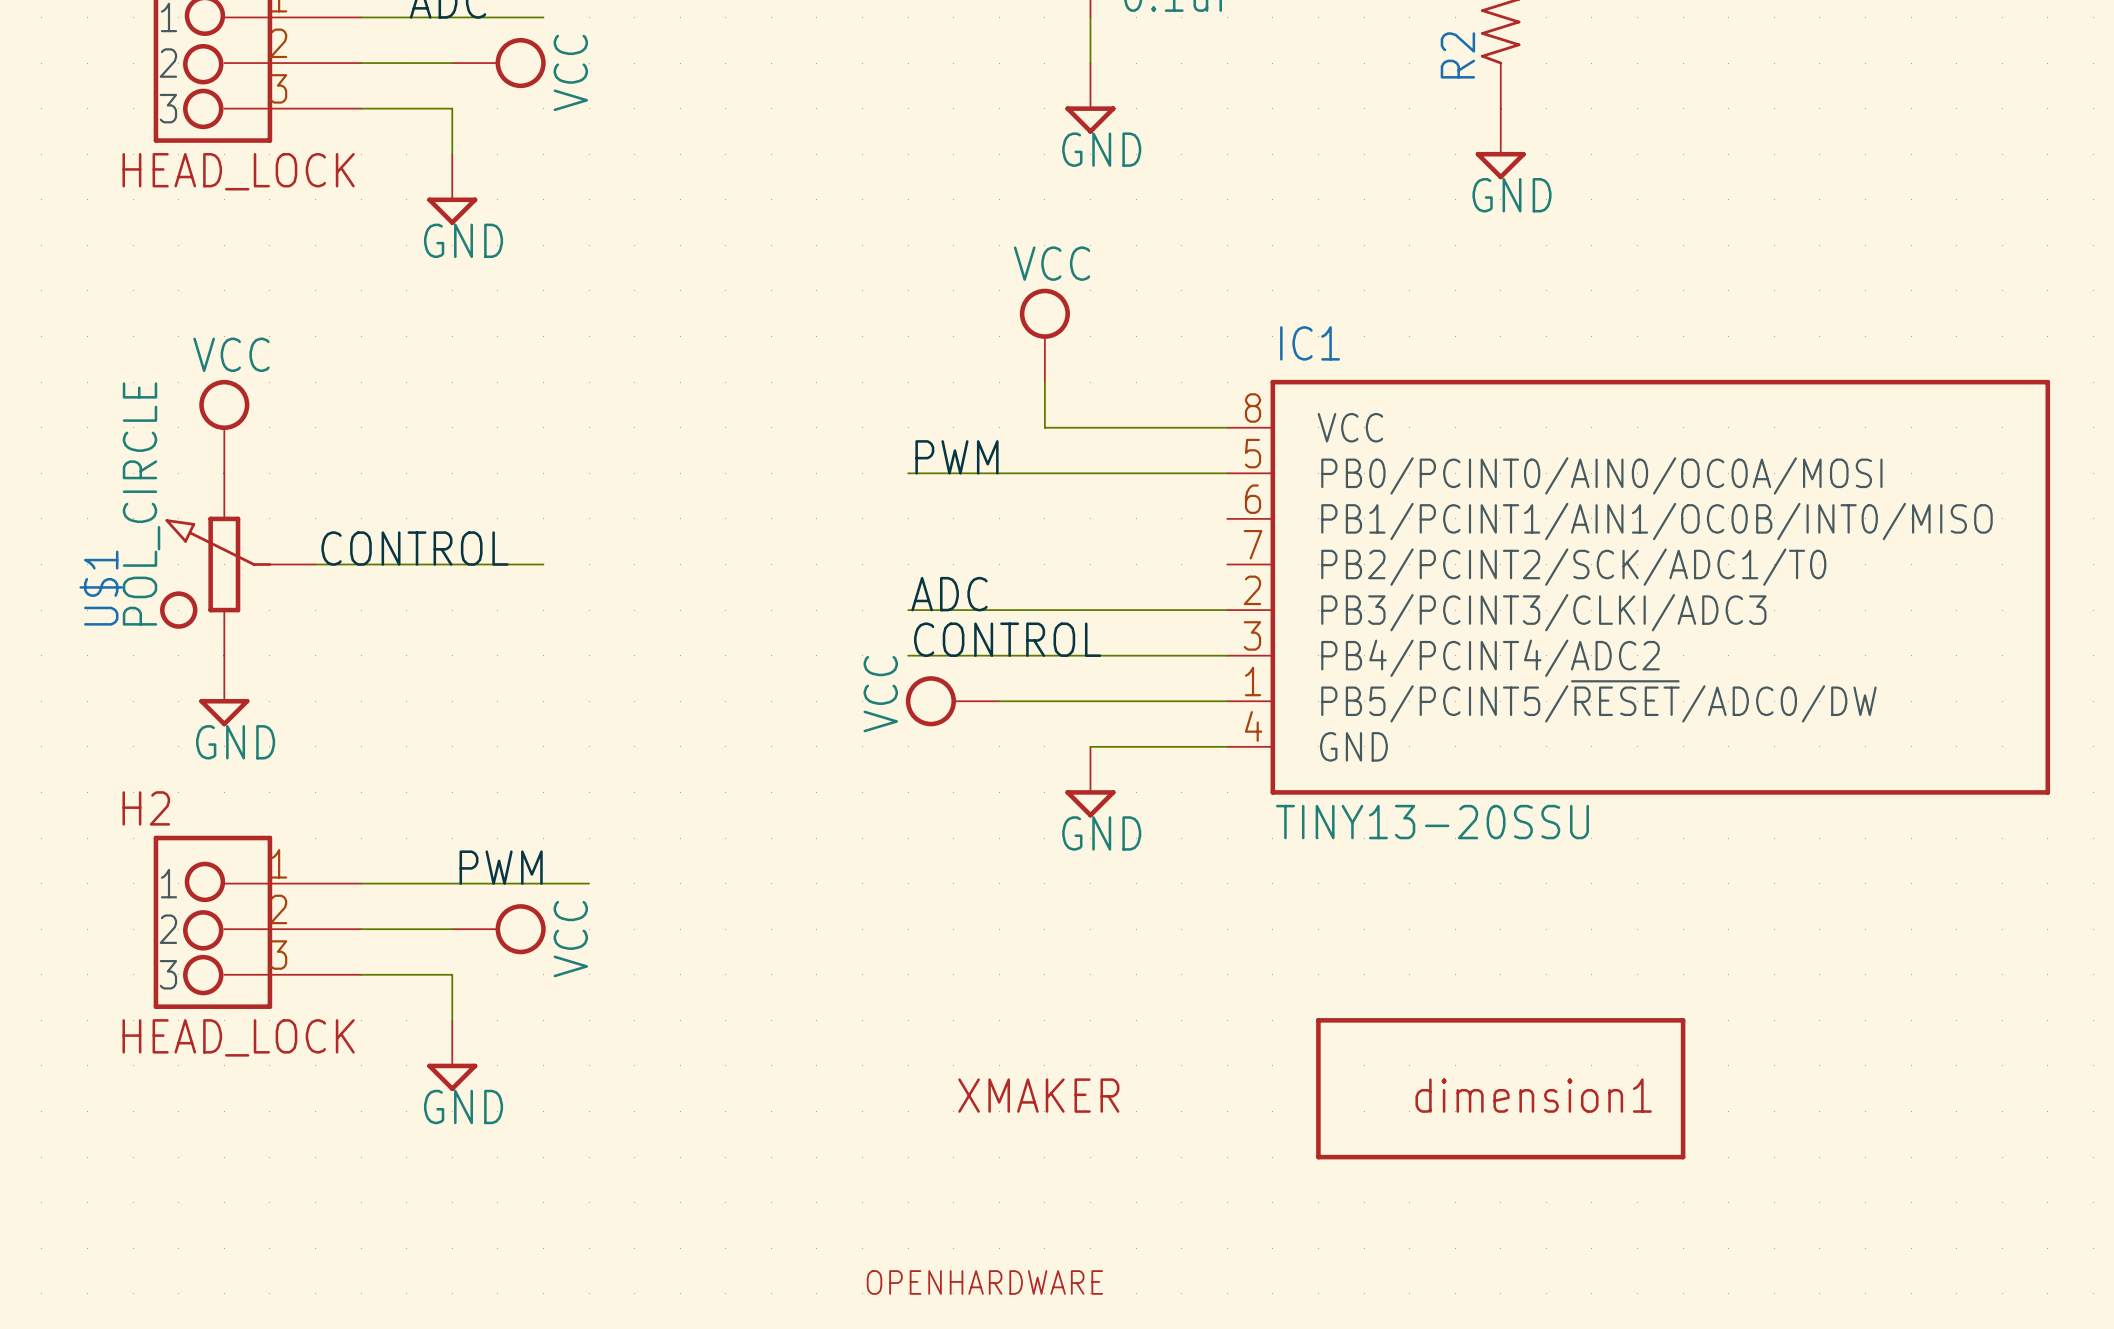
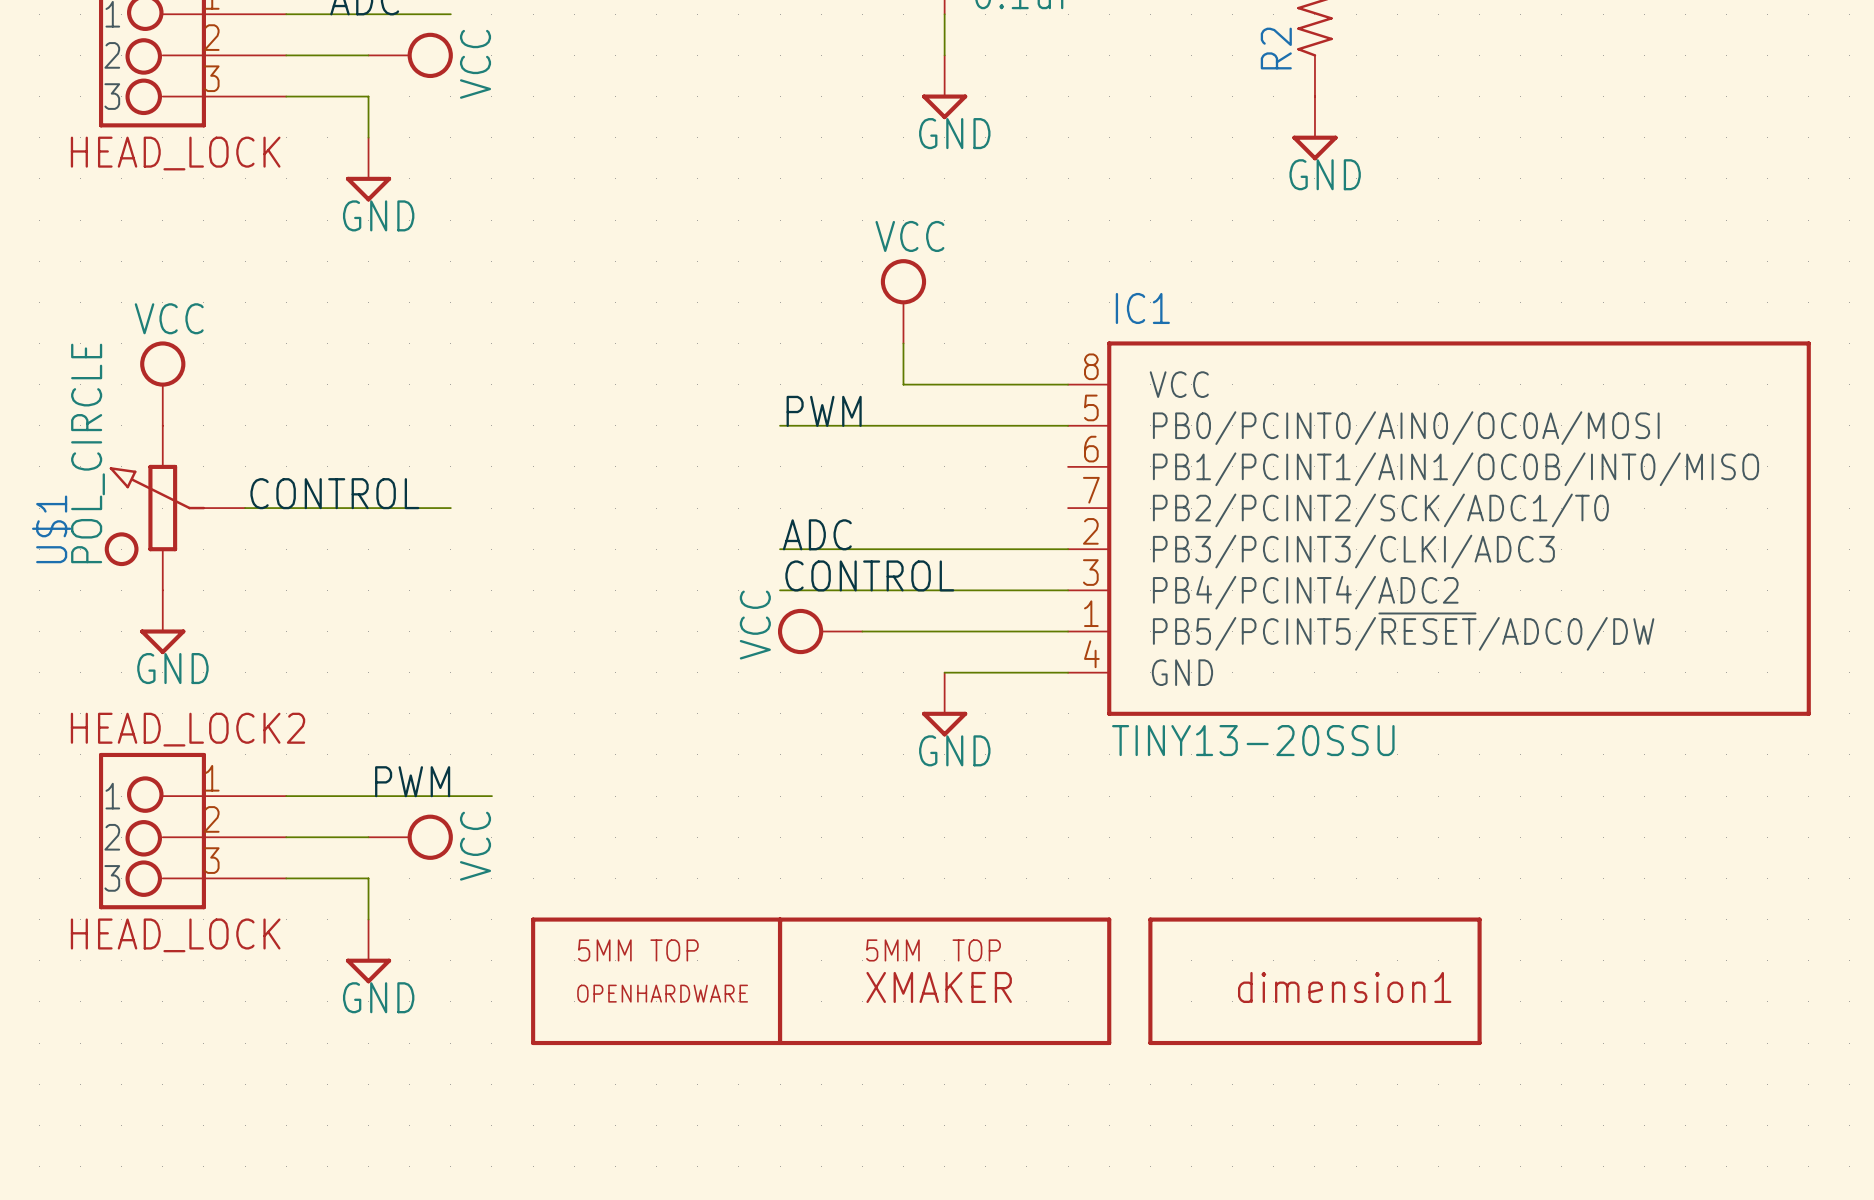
H2 name: H2 (146, 808) -> HEAD_LOCK2 (188, 729)
part: none -> (656, 981)
part: none -> (944, 981)
part: (1038, 1095) -> none
part: (984, 1282) -> none

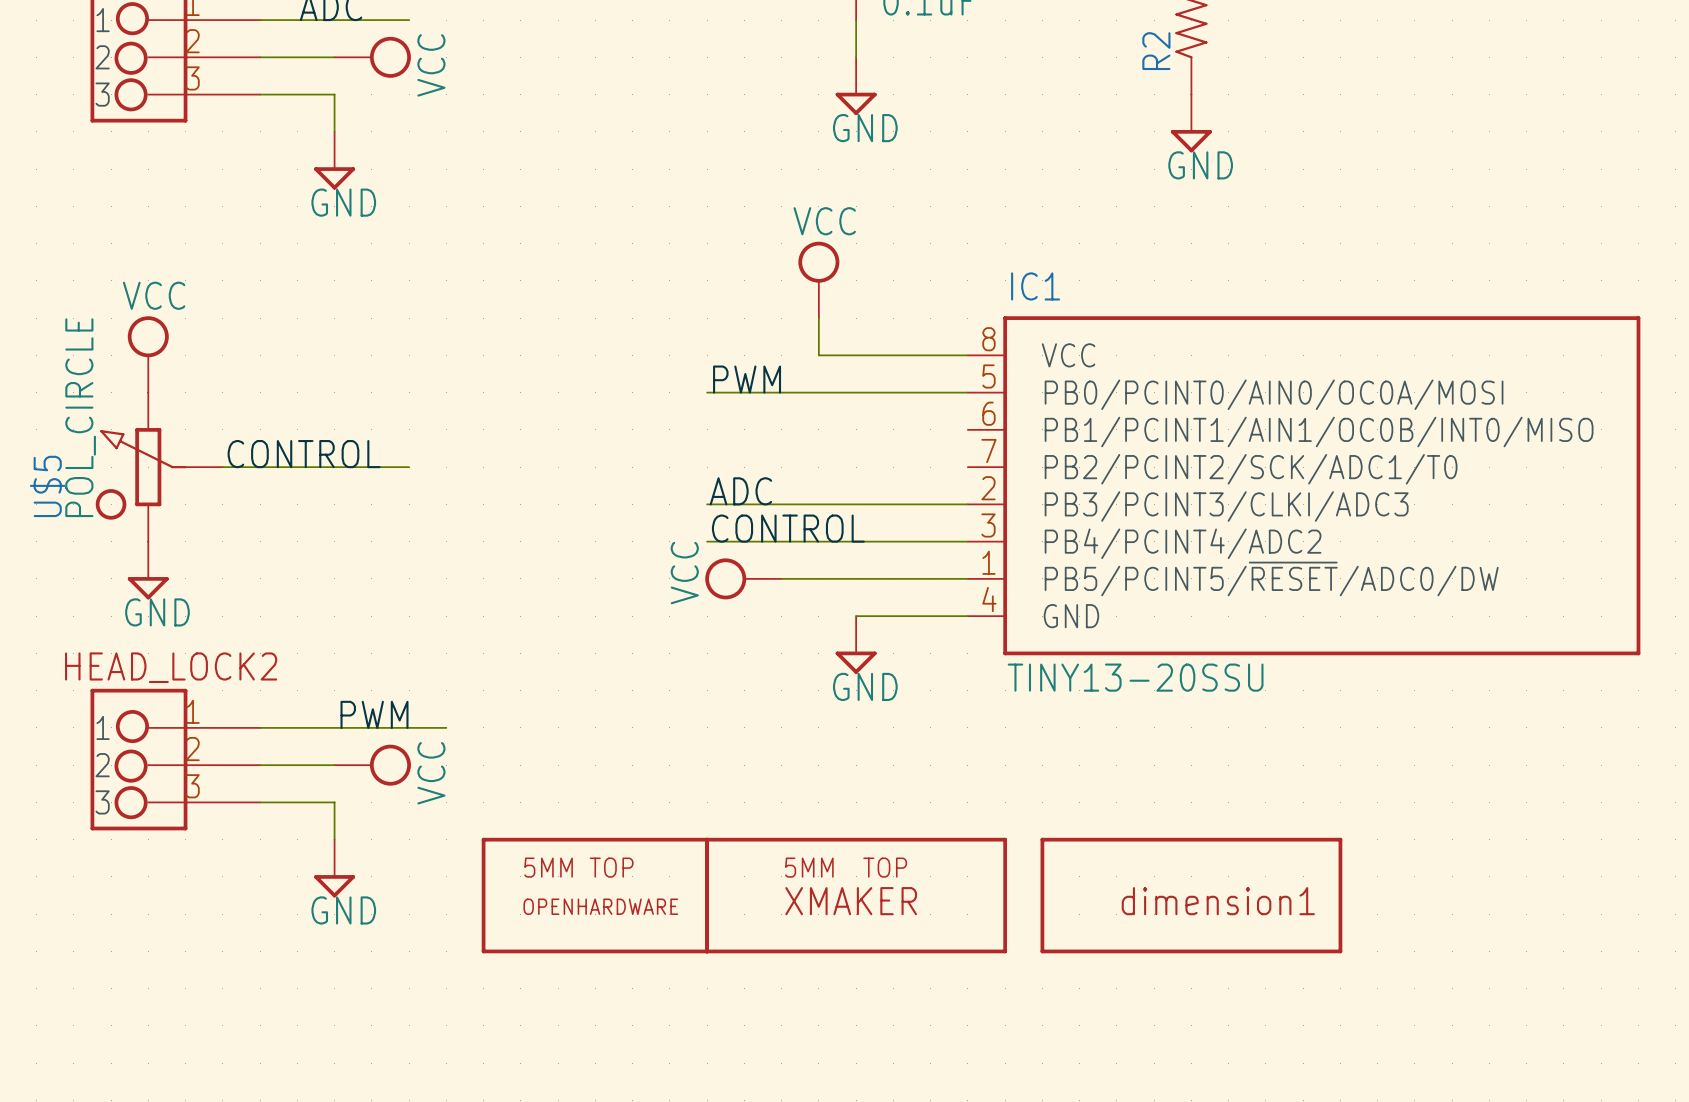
part value: HEAD_LOCK (175, 153) -> none
U$1 name: U$1 (51, 529) -> U$5 (47, 486)
HEAD_LOCK2 value: HEAD_LOCK (175, 935) -> none

